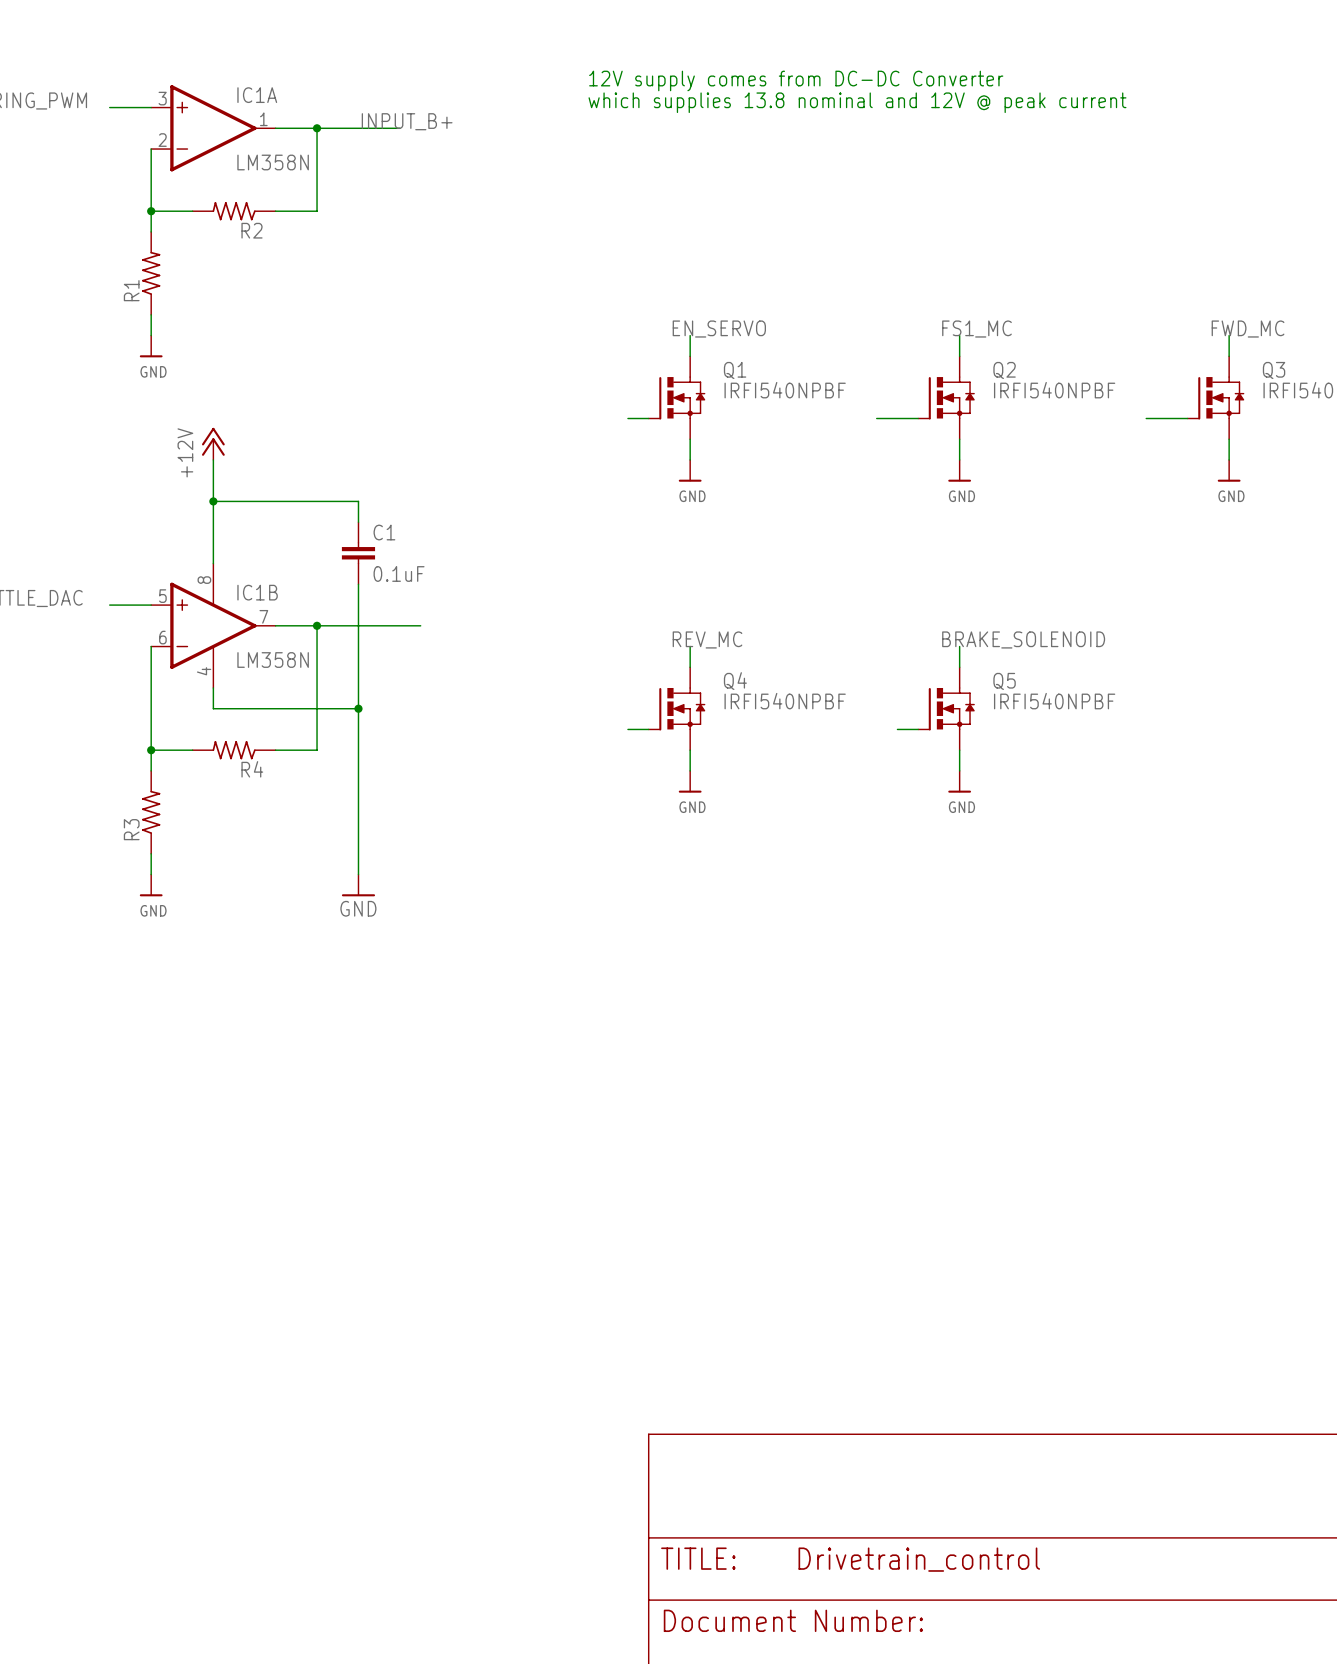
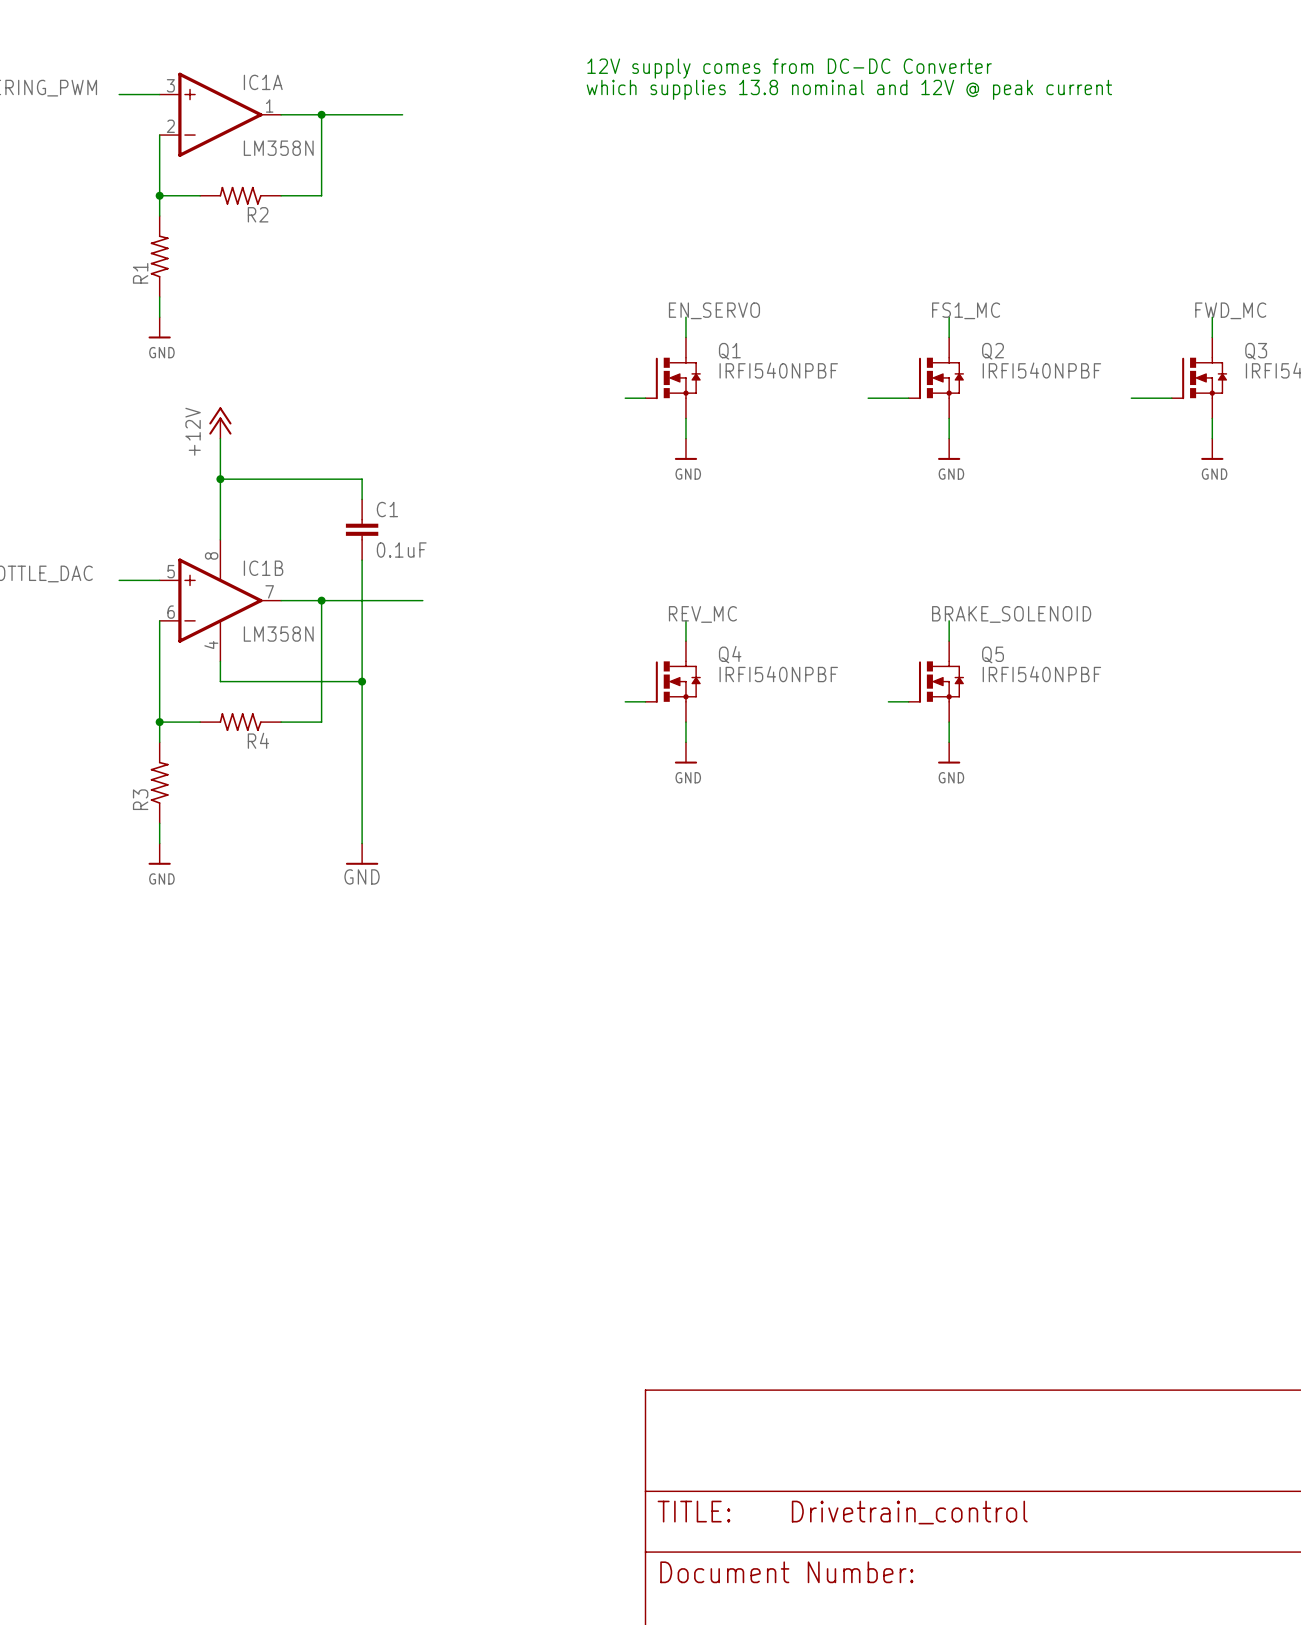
label: INPUT_B+ (407, 121) -> none

